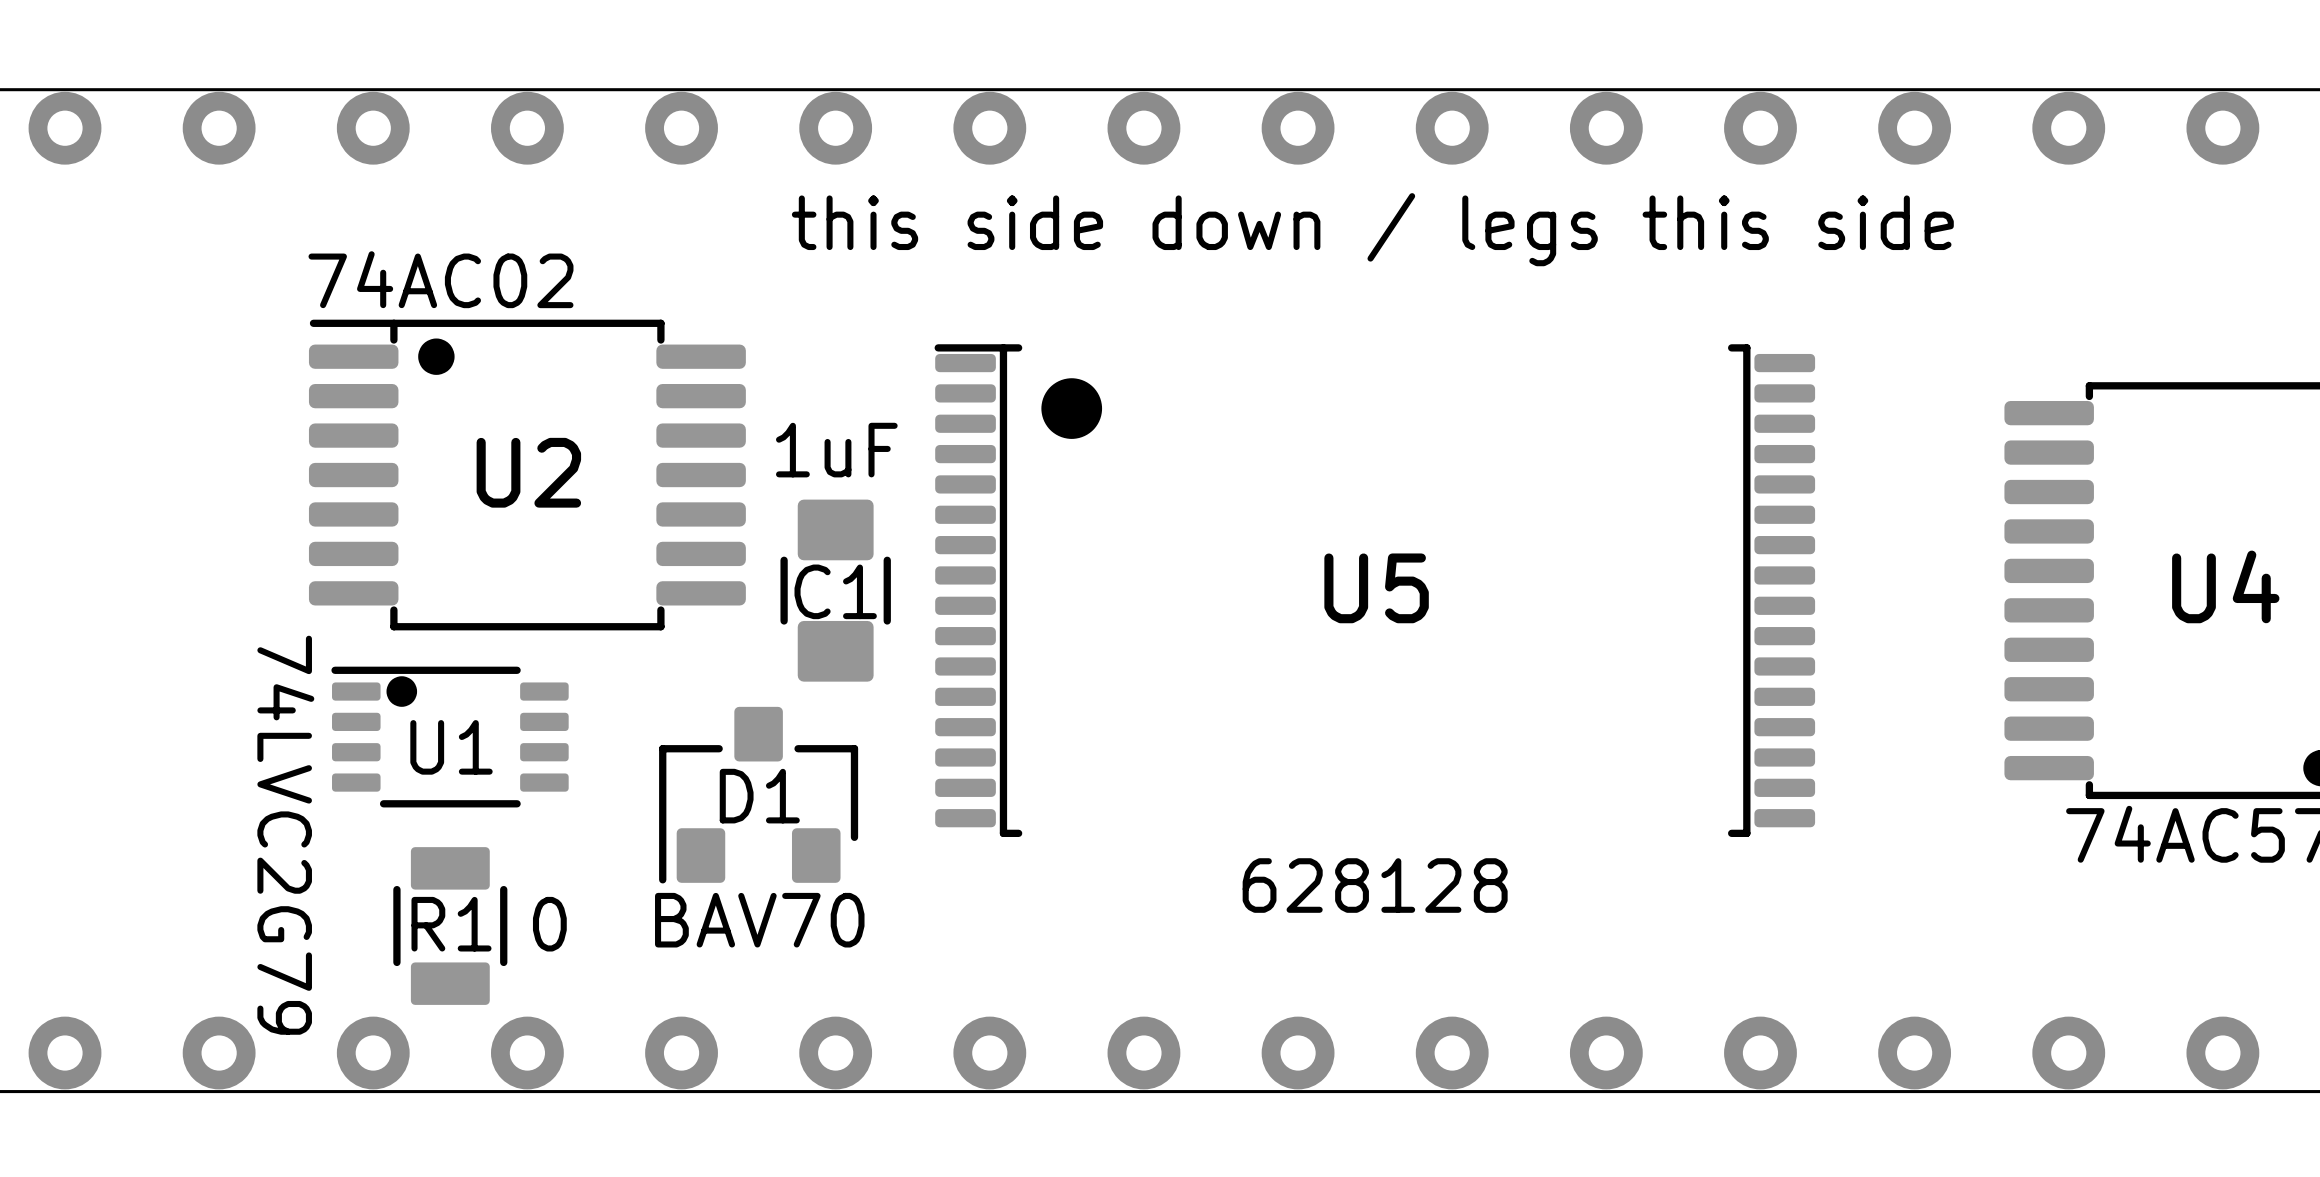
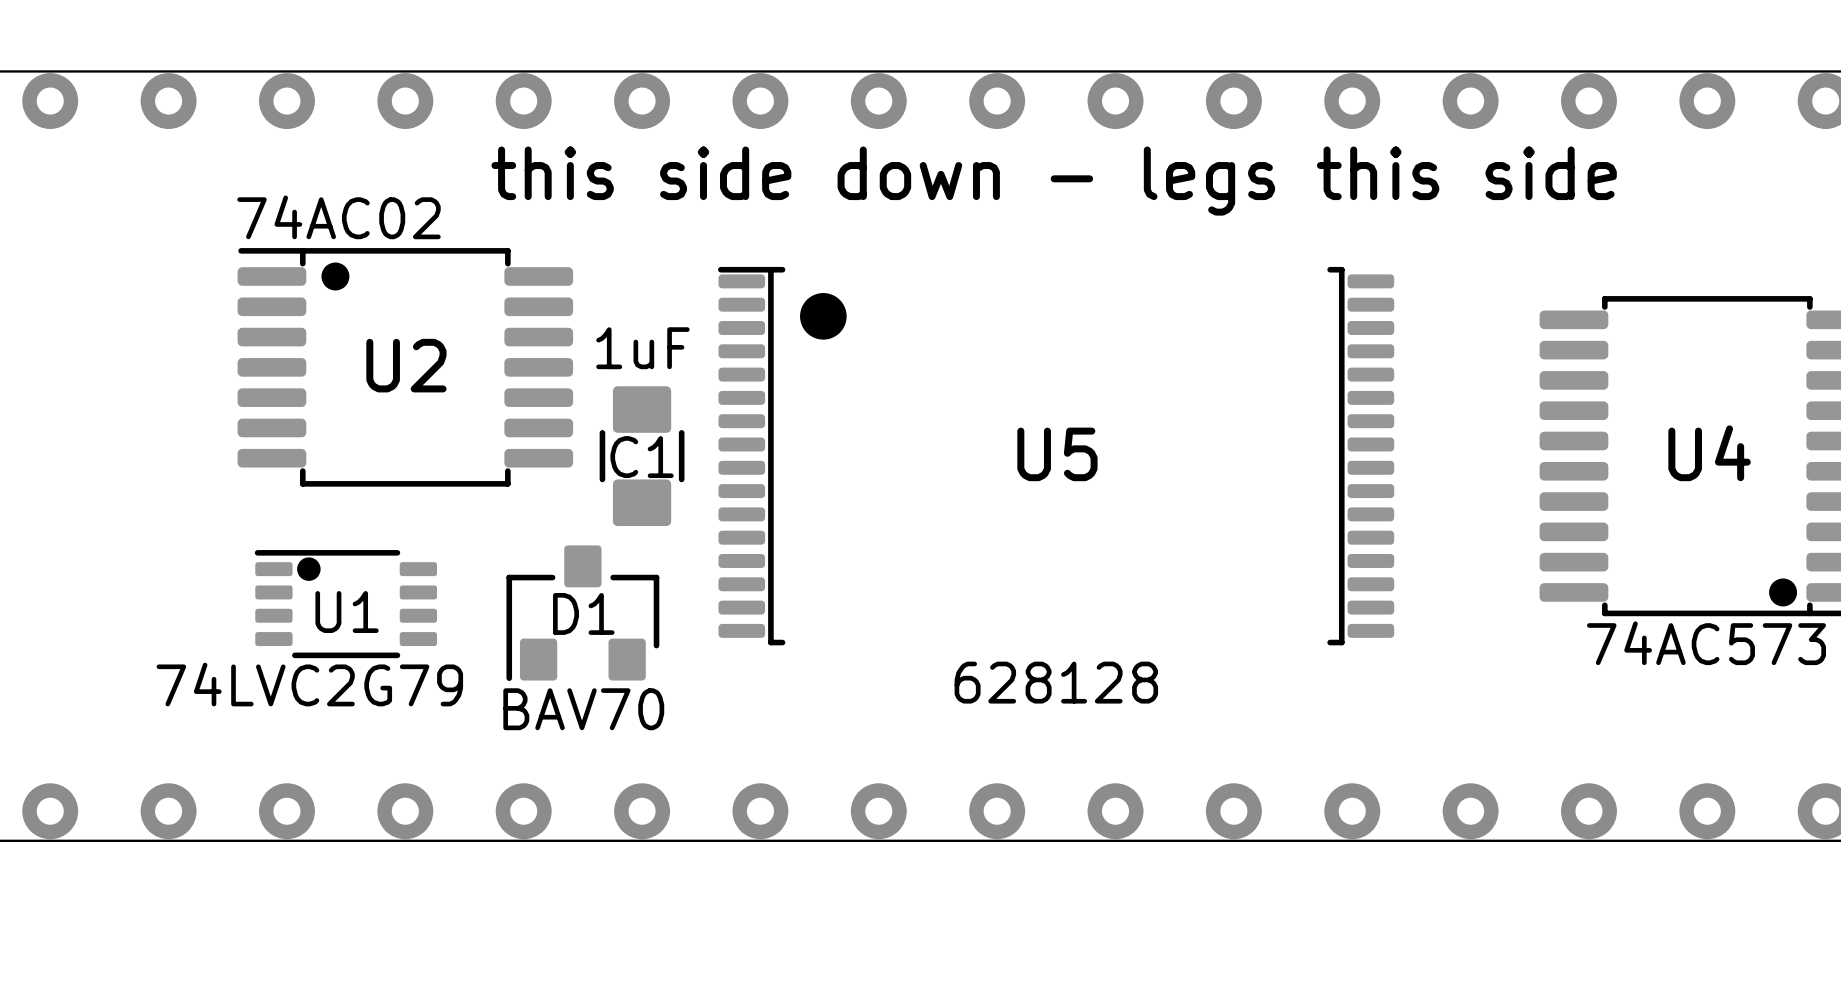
text: this side down / legs this side (1372, 229) -> this side down - legs this side (1054, 181)
U1 position: (450, 737) -> (345, 604)
U1 value rotation: 0° (285, 835) -> 90° counterclockwise (309, 684)
R1: 0 (450, 926) -> none

